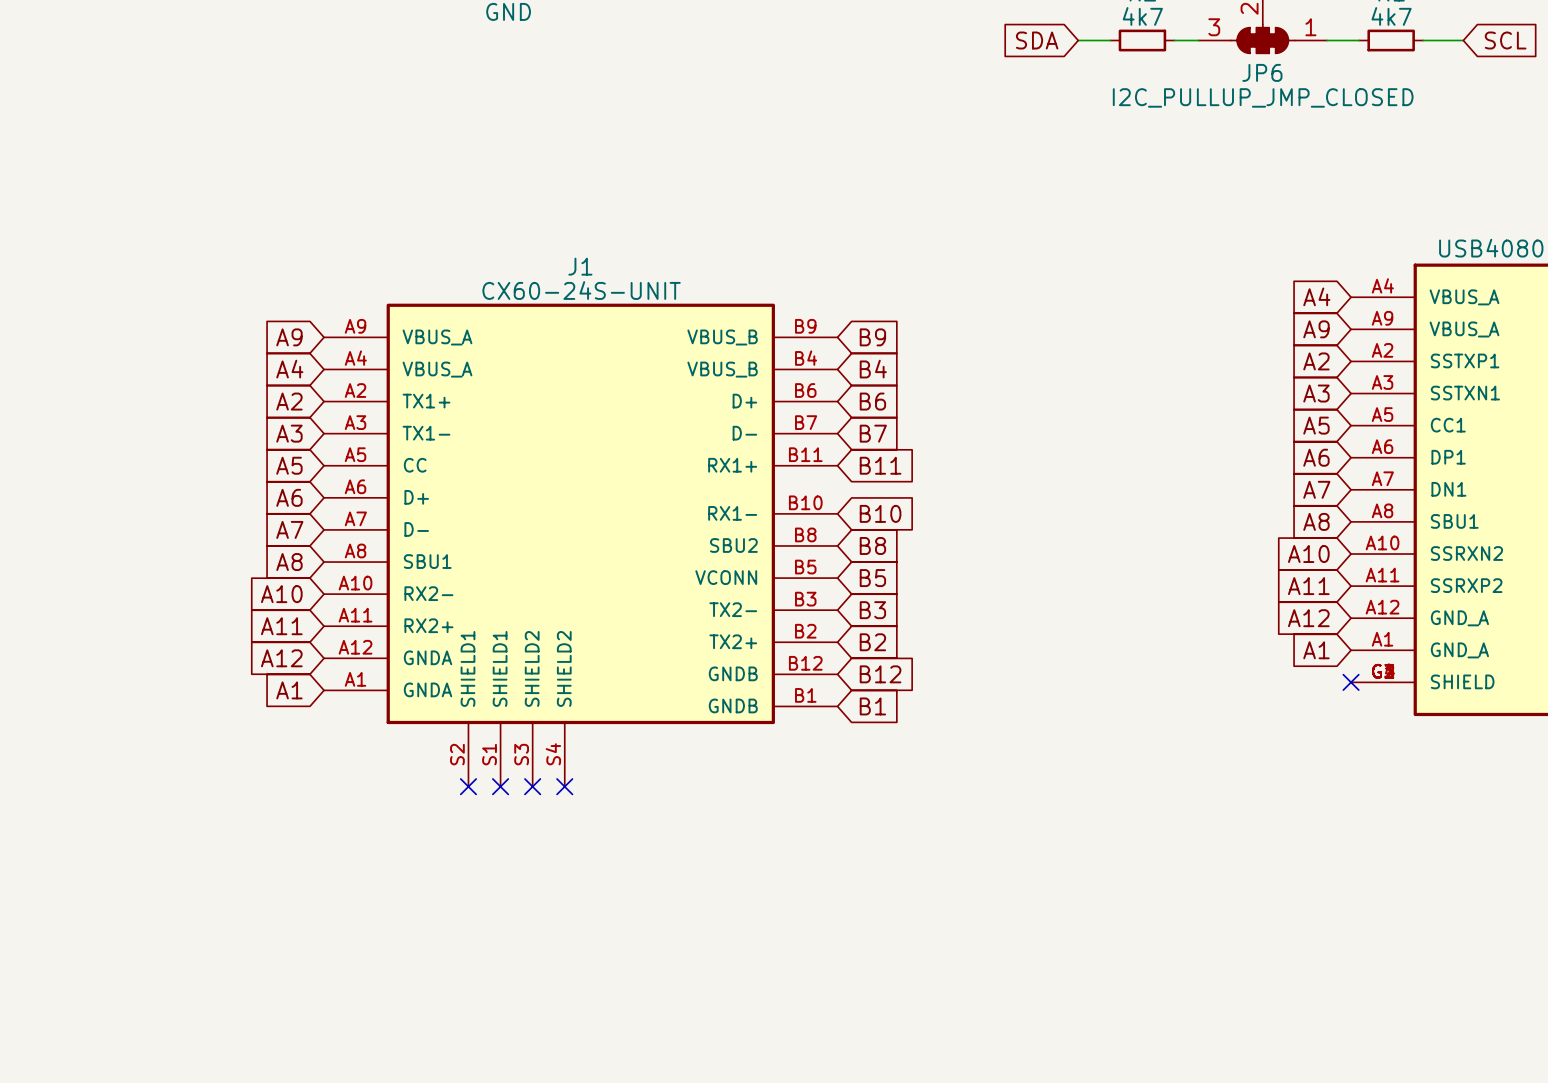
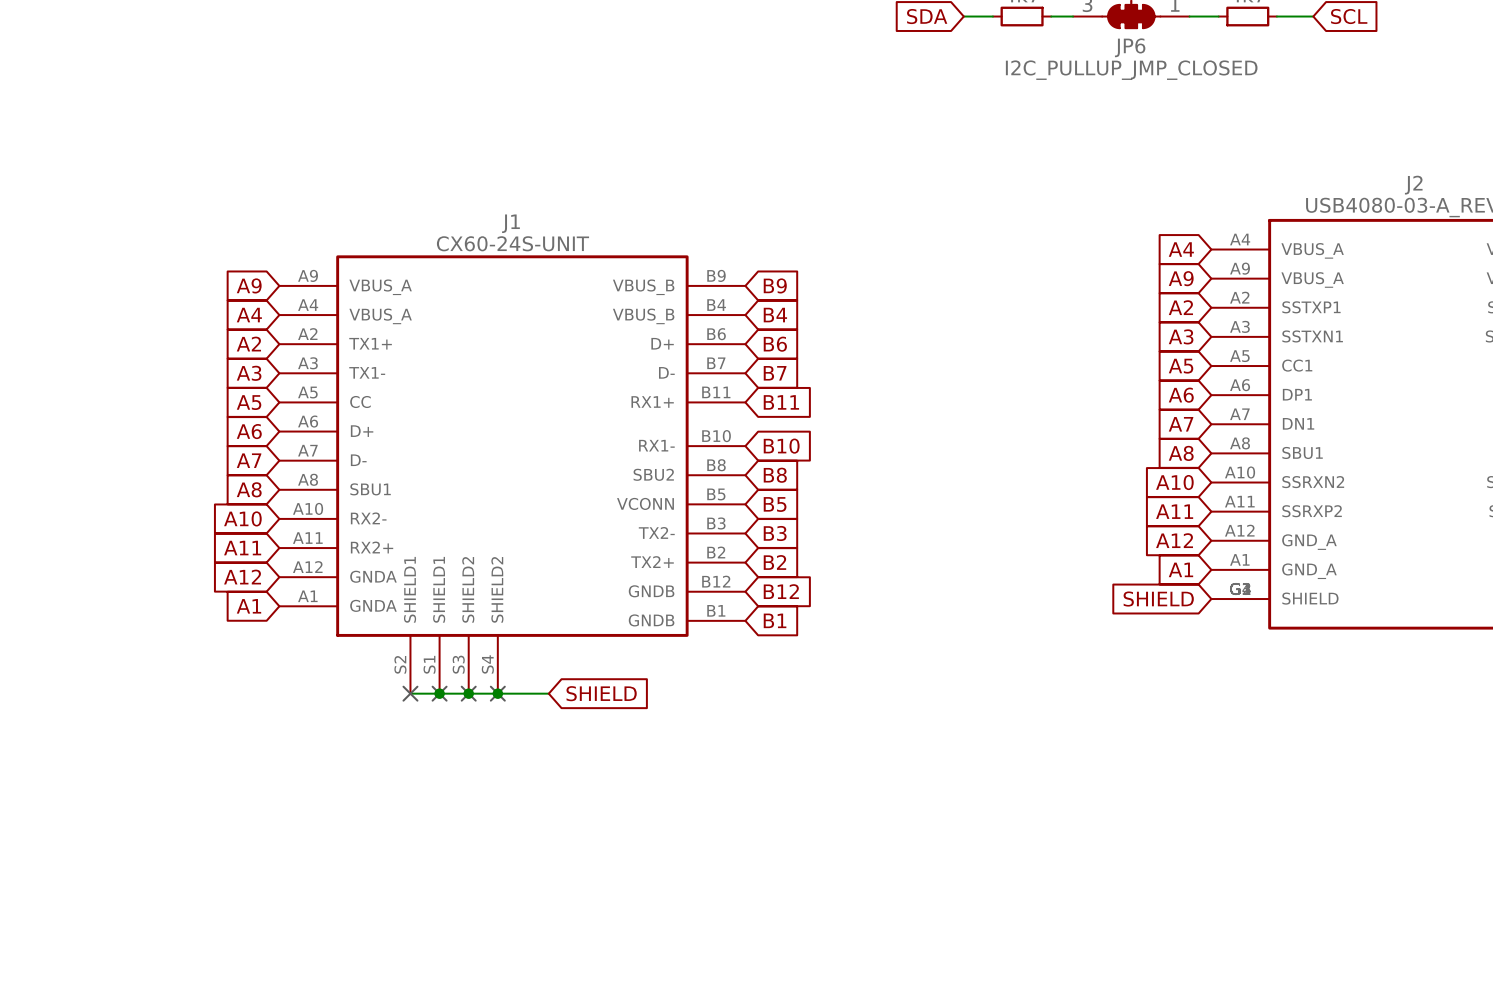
global label: none -> SHIELD (1158, 599)
no-connect mark: (1351, 682) -> none
wire: none -> (410, 693) (548, 693)
junction: none -> (439, 693)
junction: none -> (468, 693)
junction: none -> (497, 693)
global label: none -> SHIELD (601, 693)

